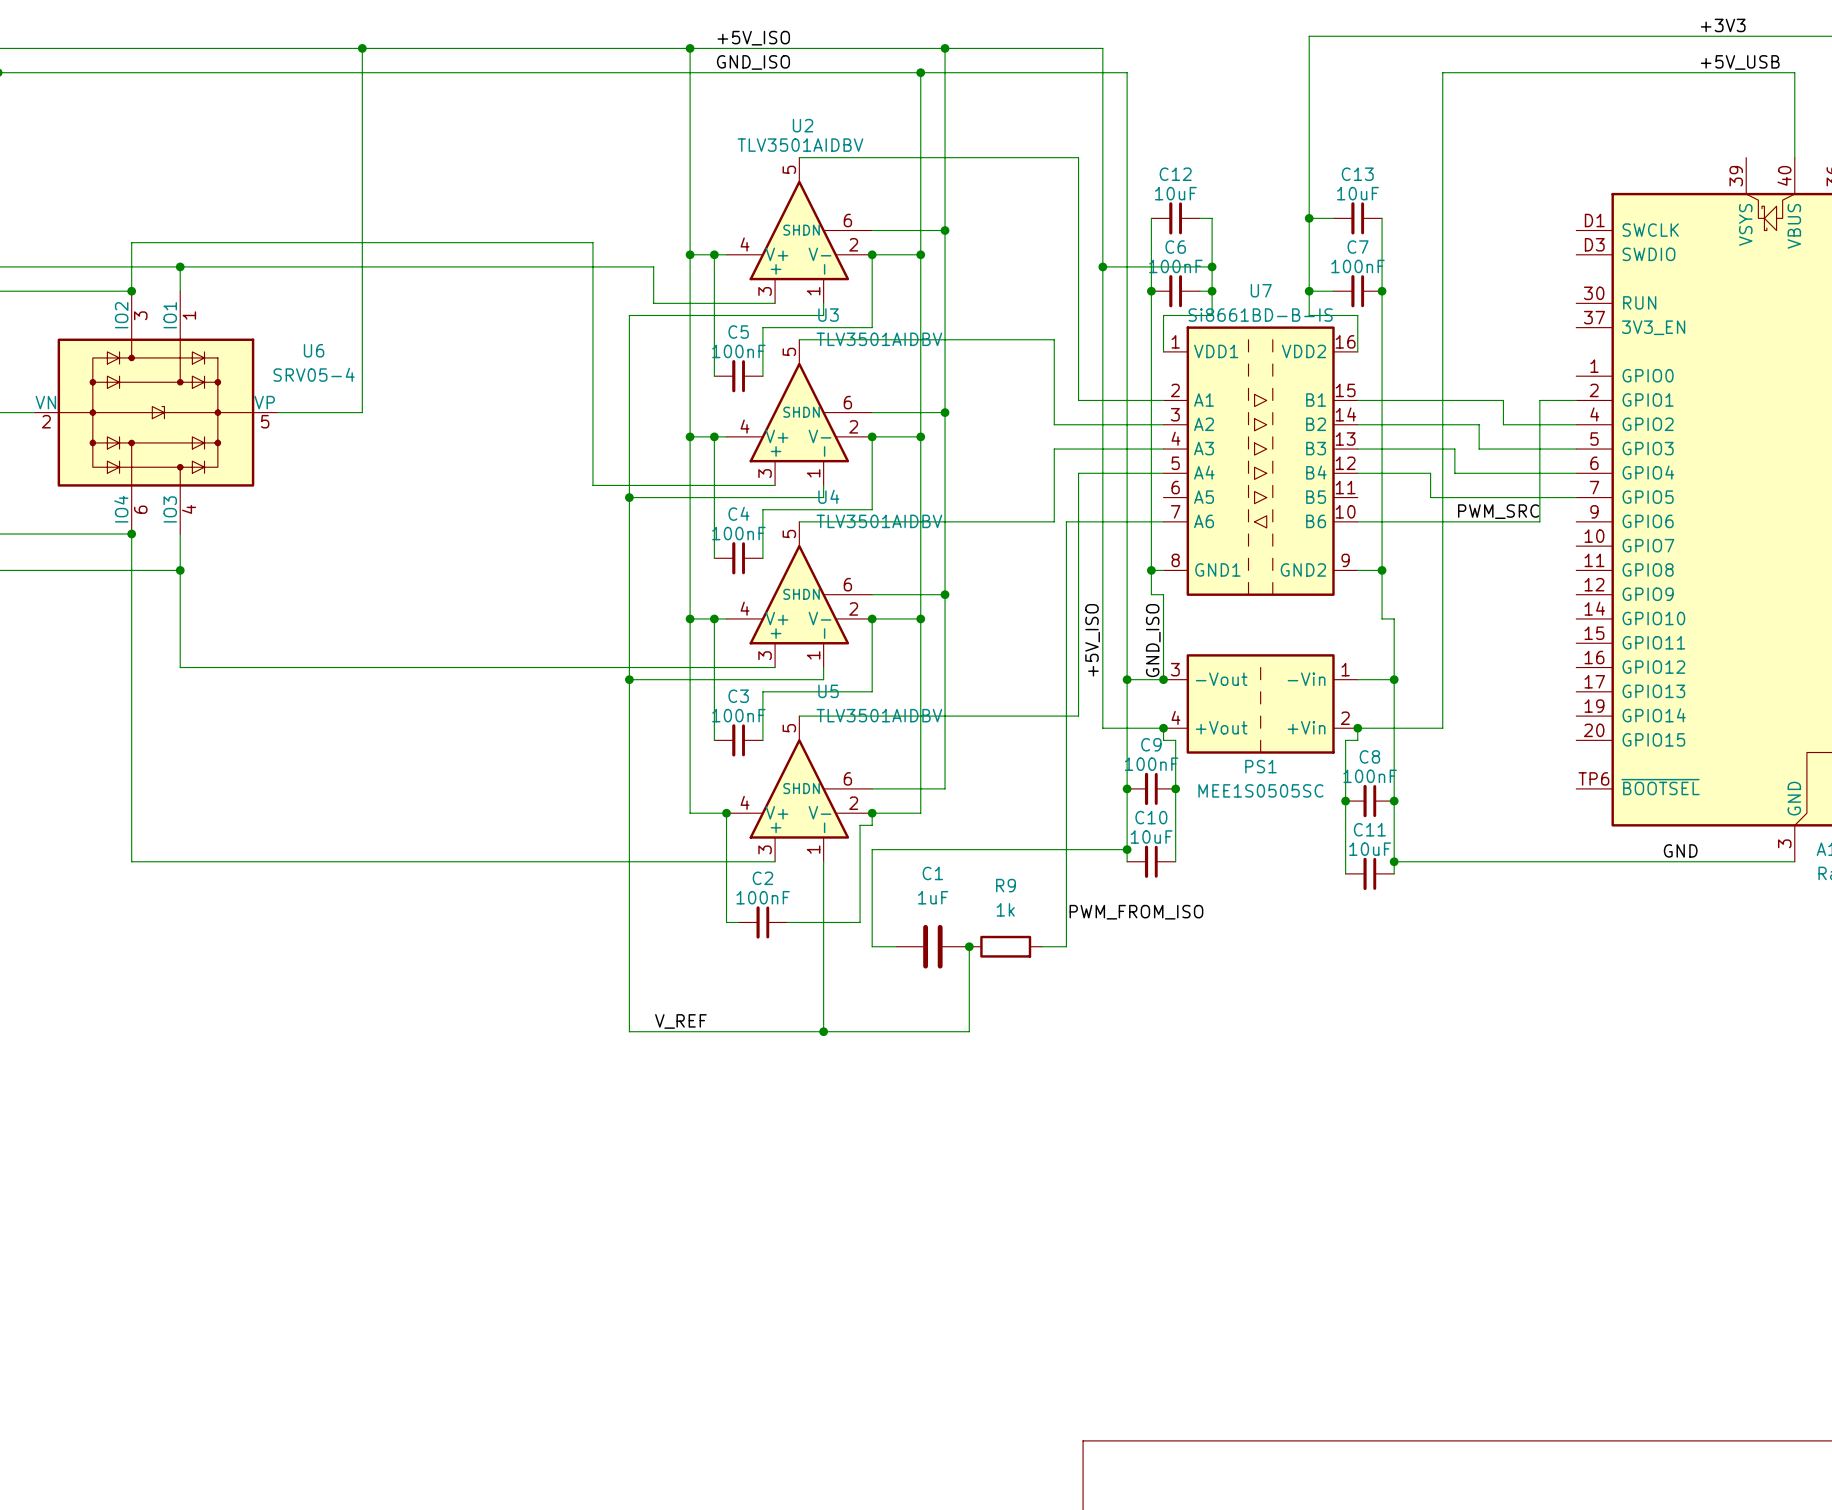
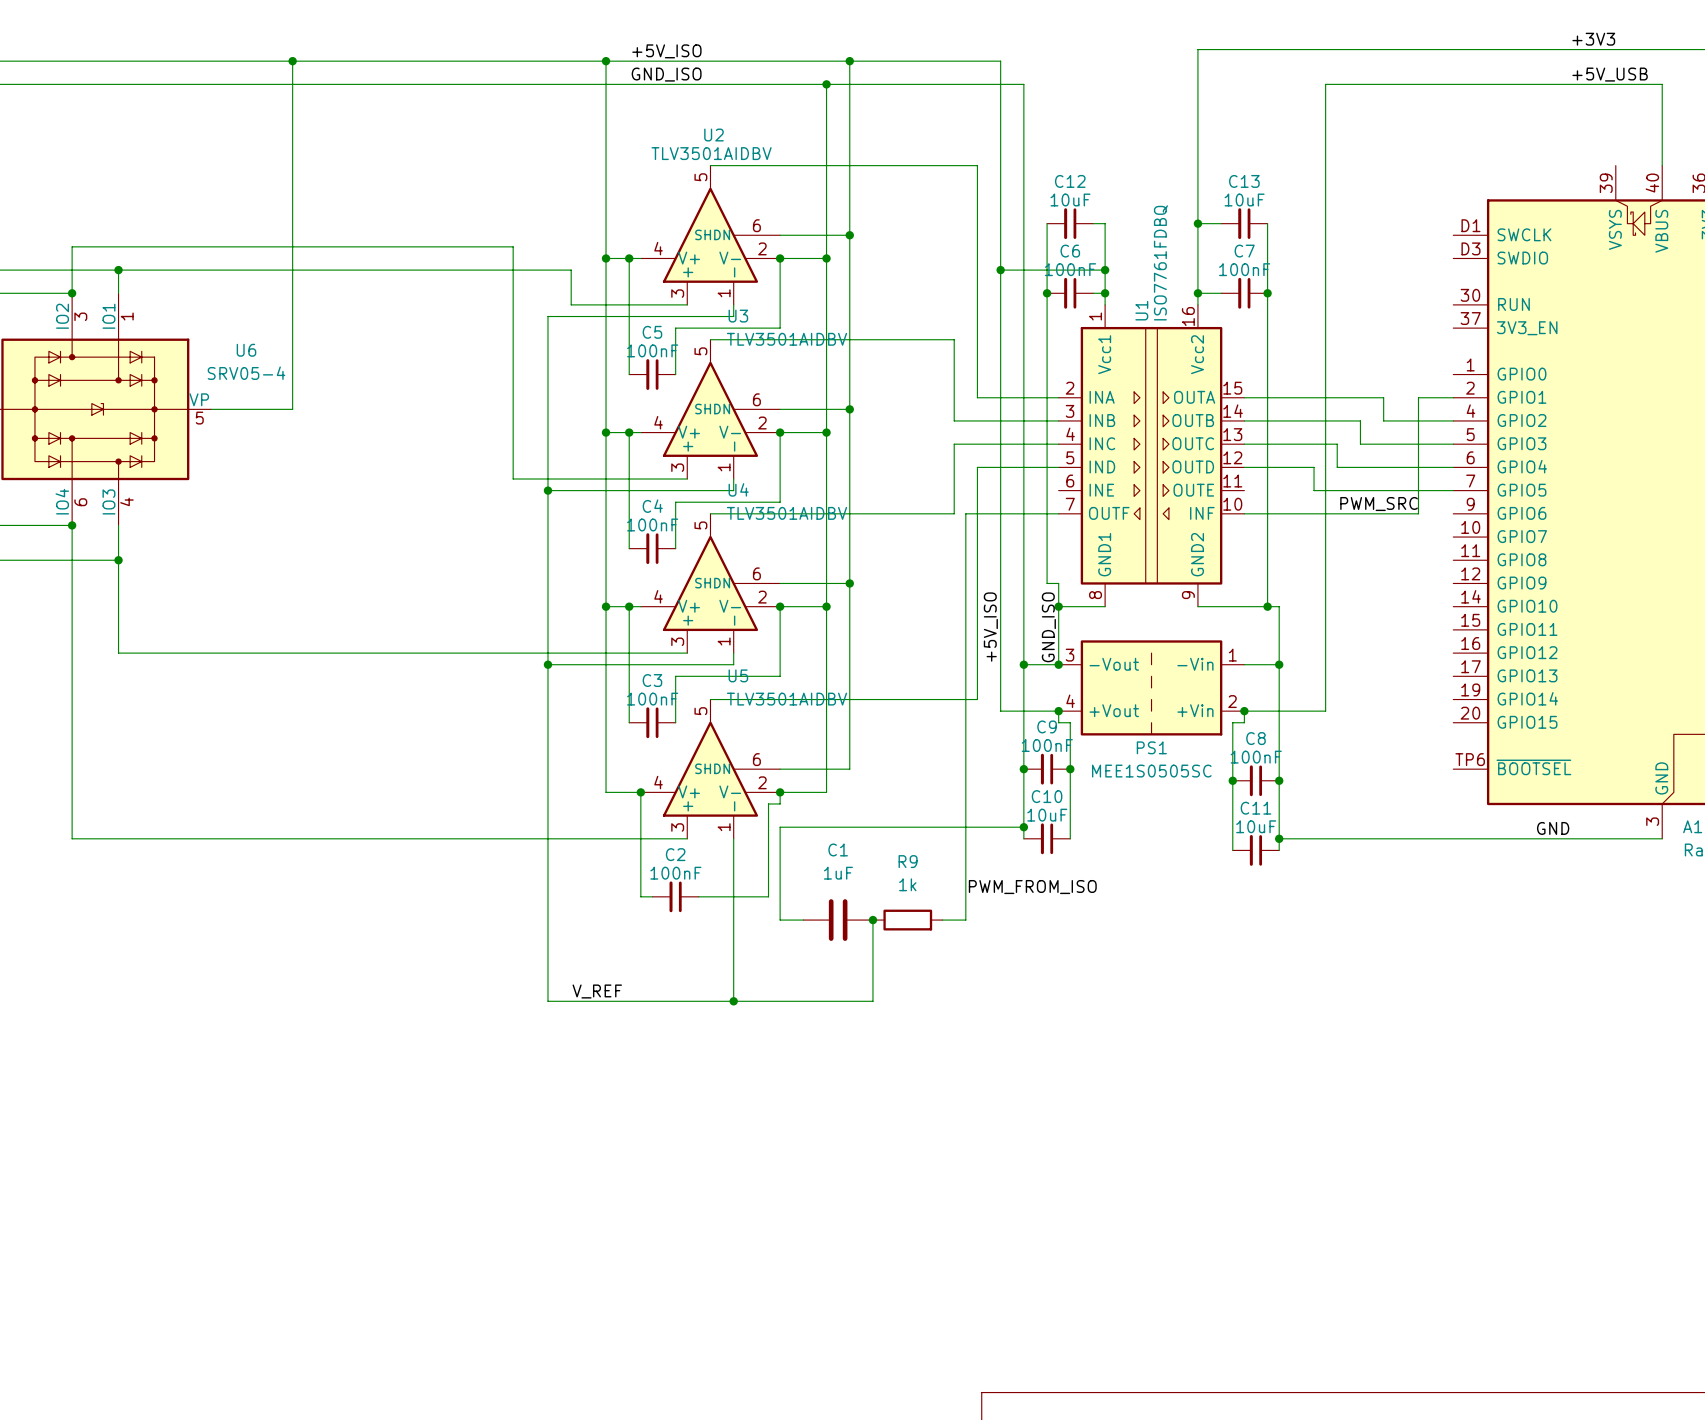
wire: (1212, 303) (1212, 315) (1163, 315) (1163, 351) -> none
wire: (1309, 303) (1309, 315) (1357, 315) (1357, 351) -> none
U7: Si8661BD-B-IS (1260, 461) -> none
U1: none -> ISO7761FDBQ (1151, 455)
wire: (1151, 570) (1163, 570) -> none
junction position: (1151, 570) -> (1058, 606)
wire: (1357, 570) (1382, 570) -> none
junction position: (1382, 570) -> (1267, 606)
wire: none -> (1058, 606) (1105, 606)
wire: none -> (1197, 606) (1267, 606)

